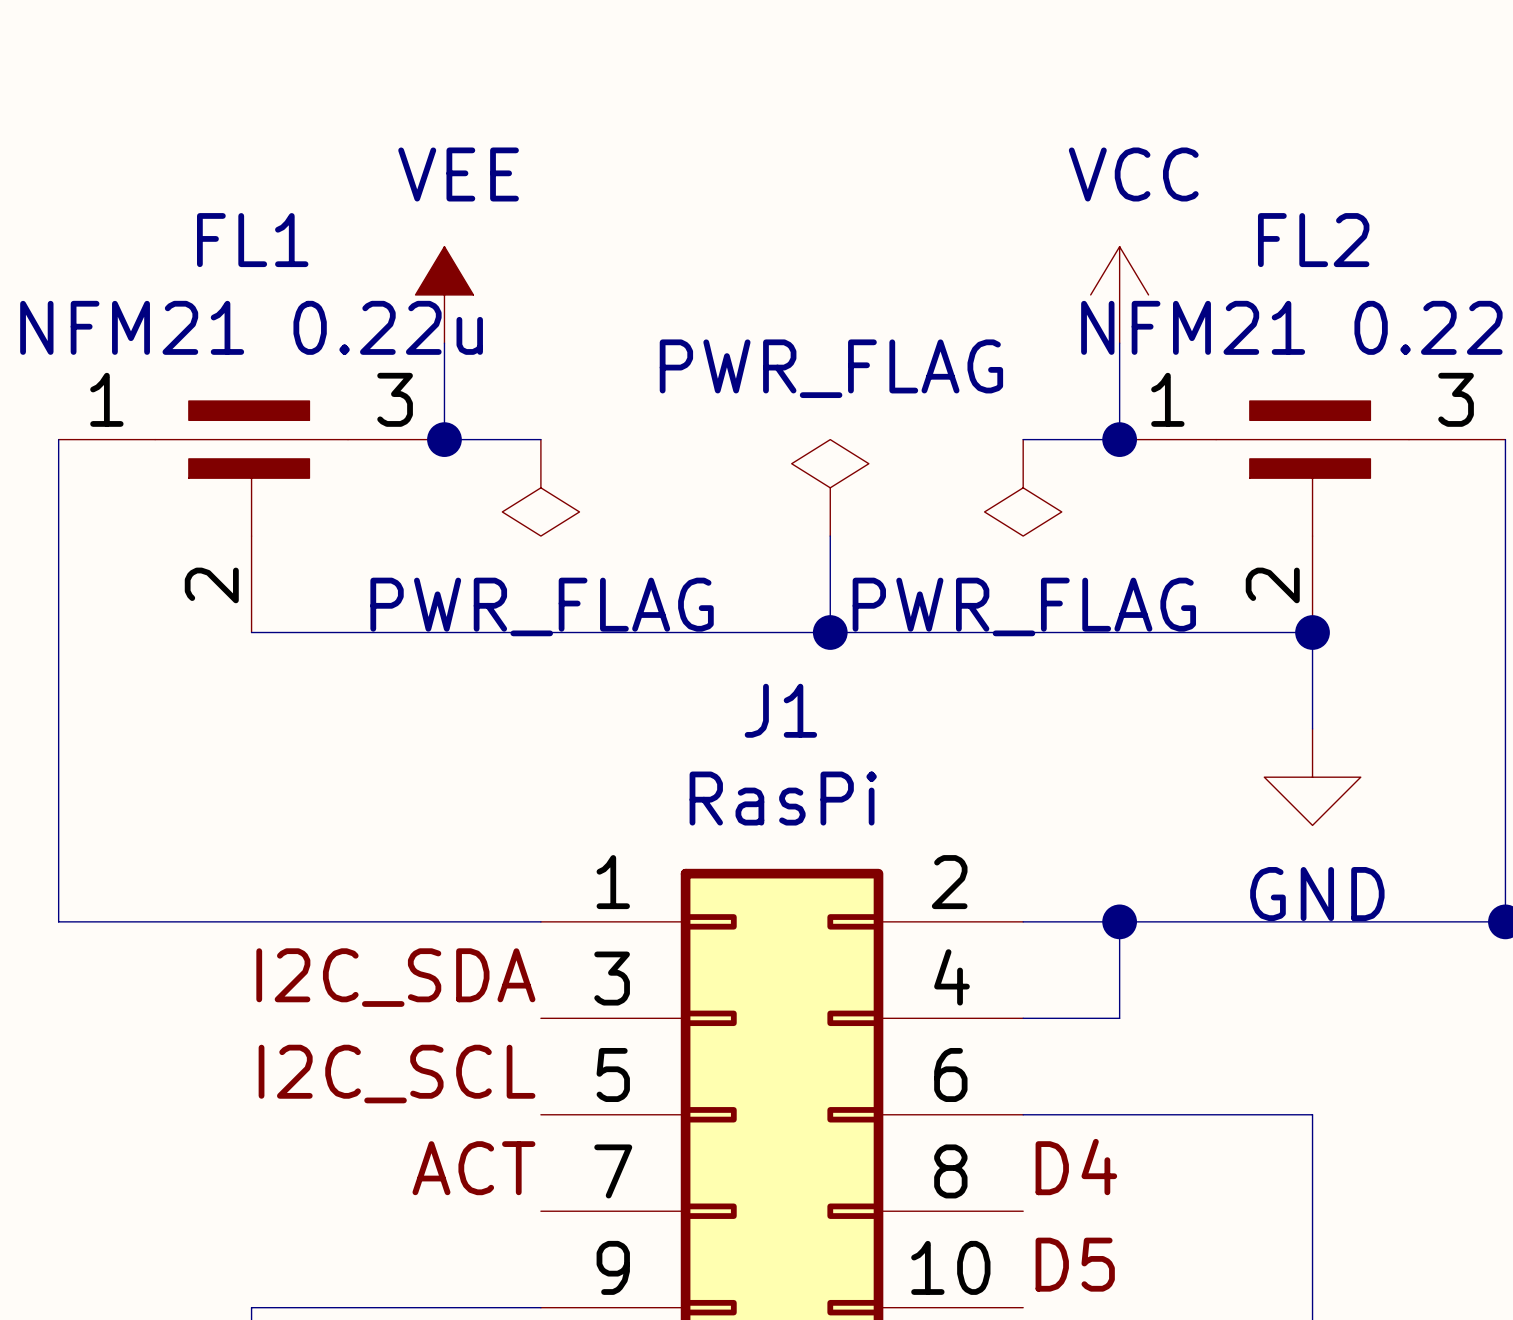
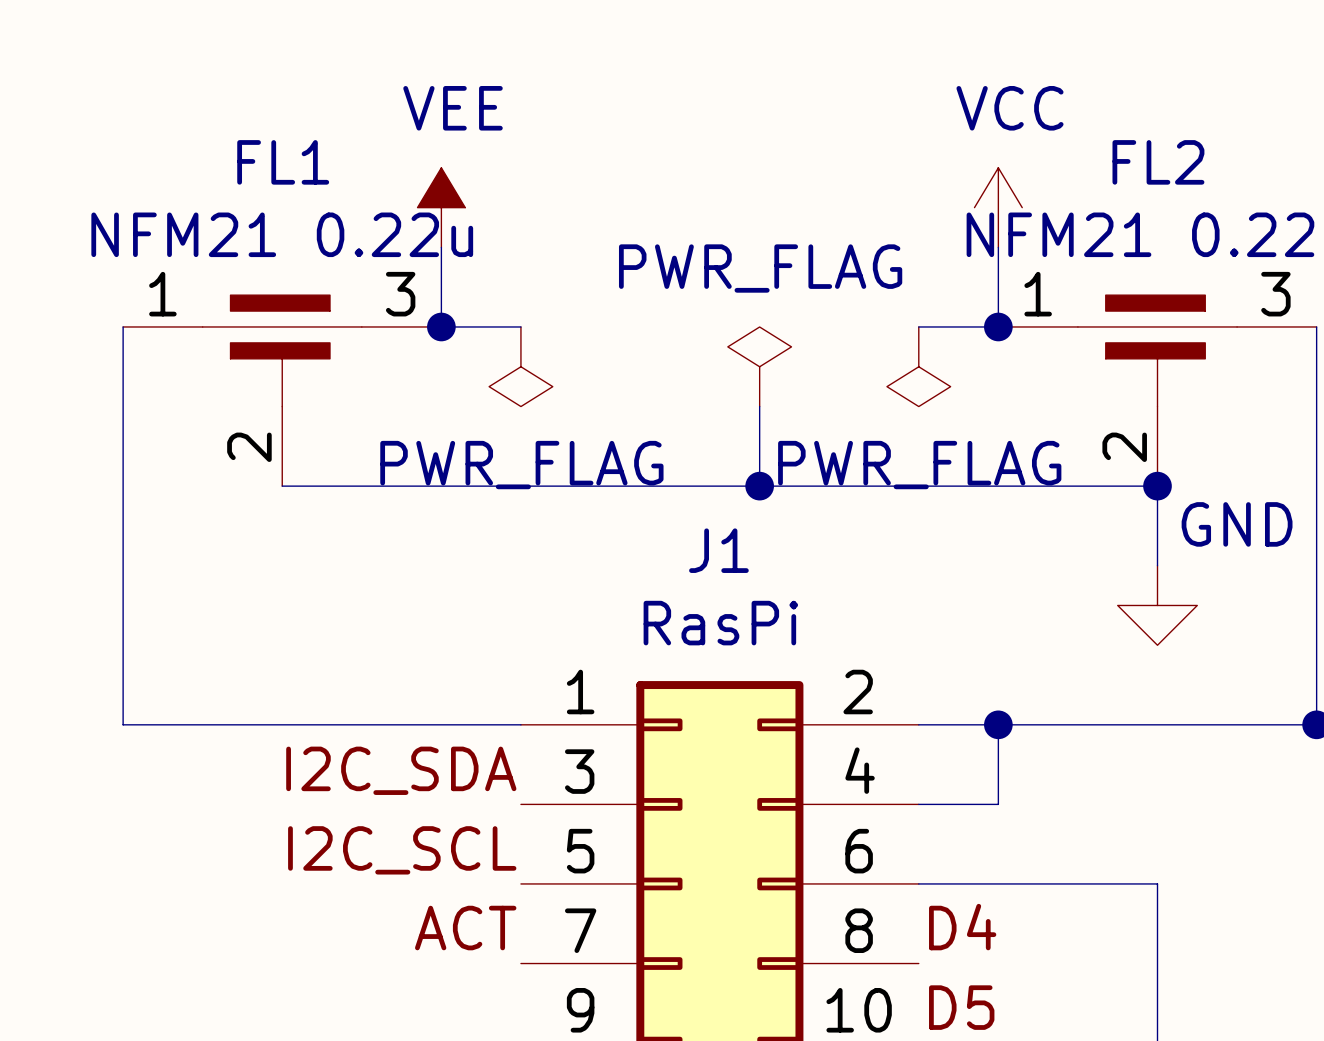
power symbol text position: GND (1317, 894) -> GND (1237, 524)

